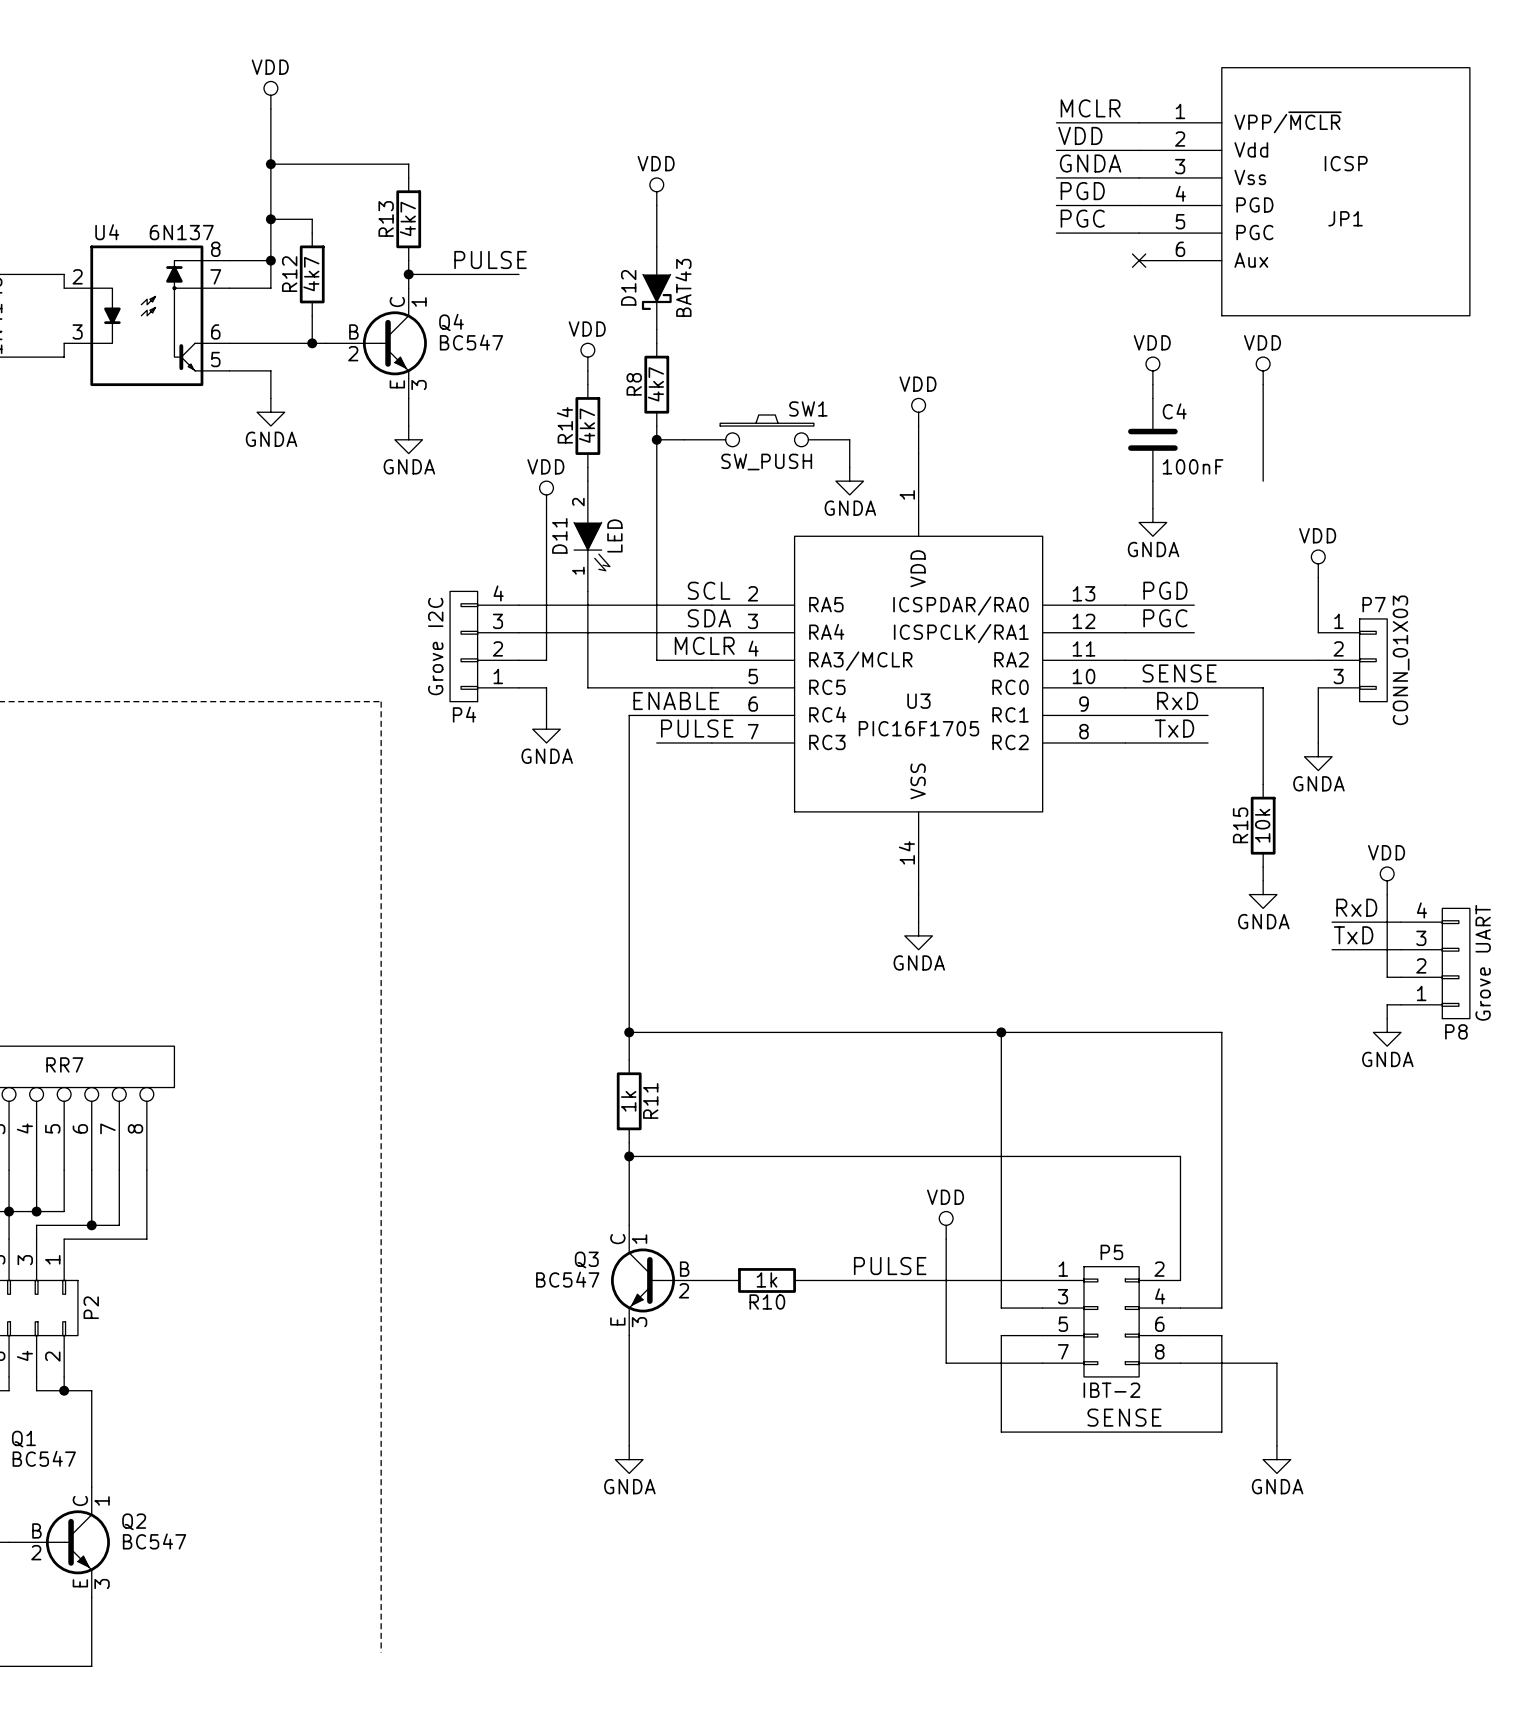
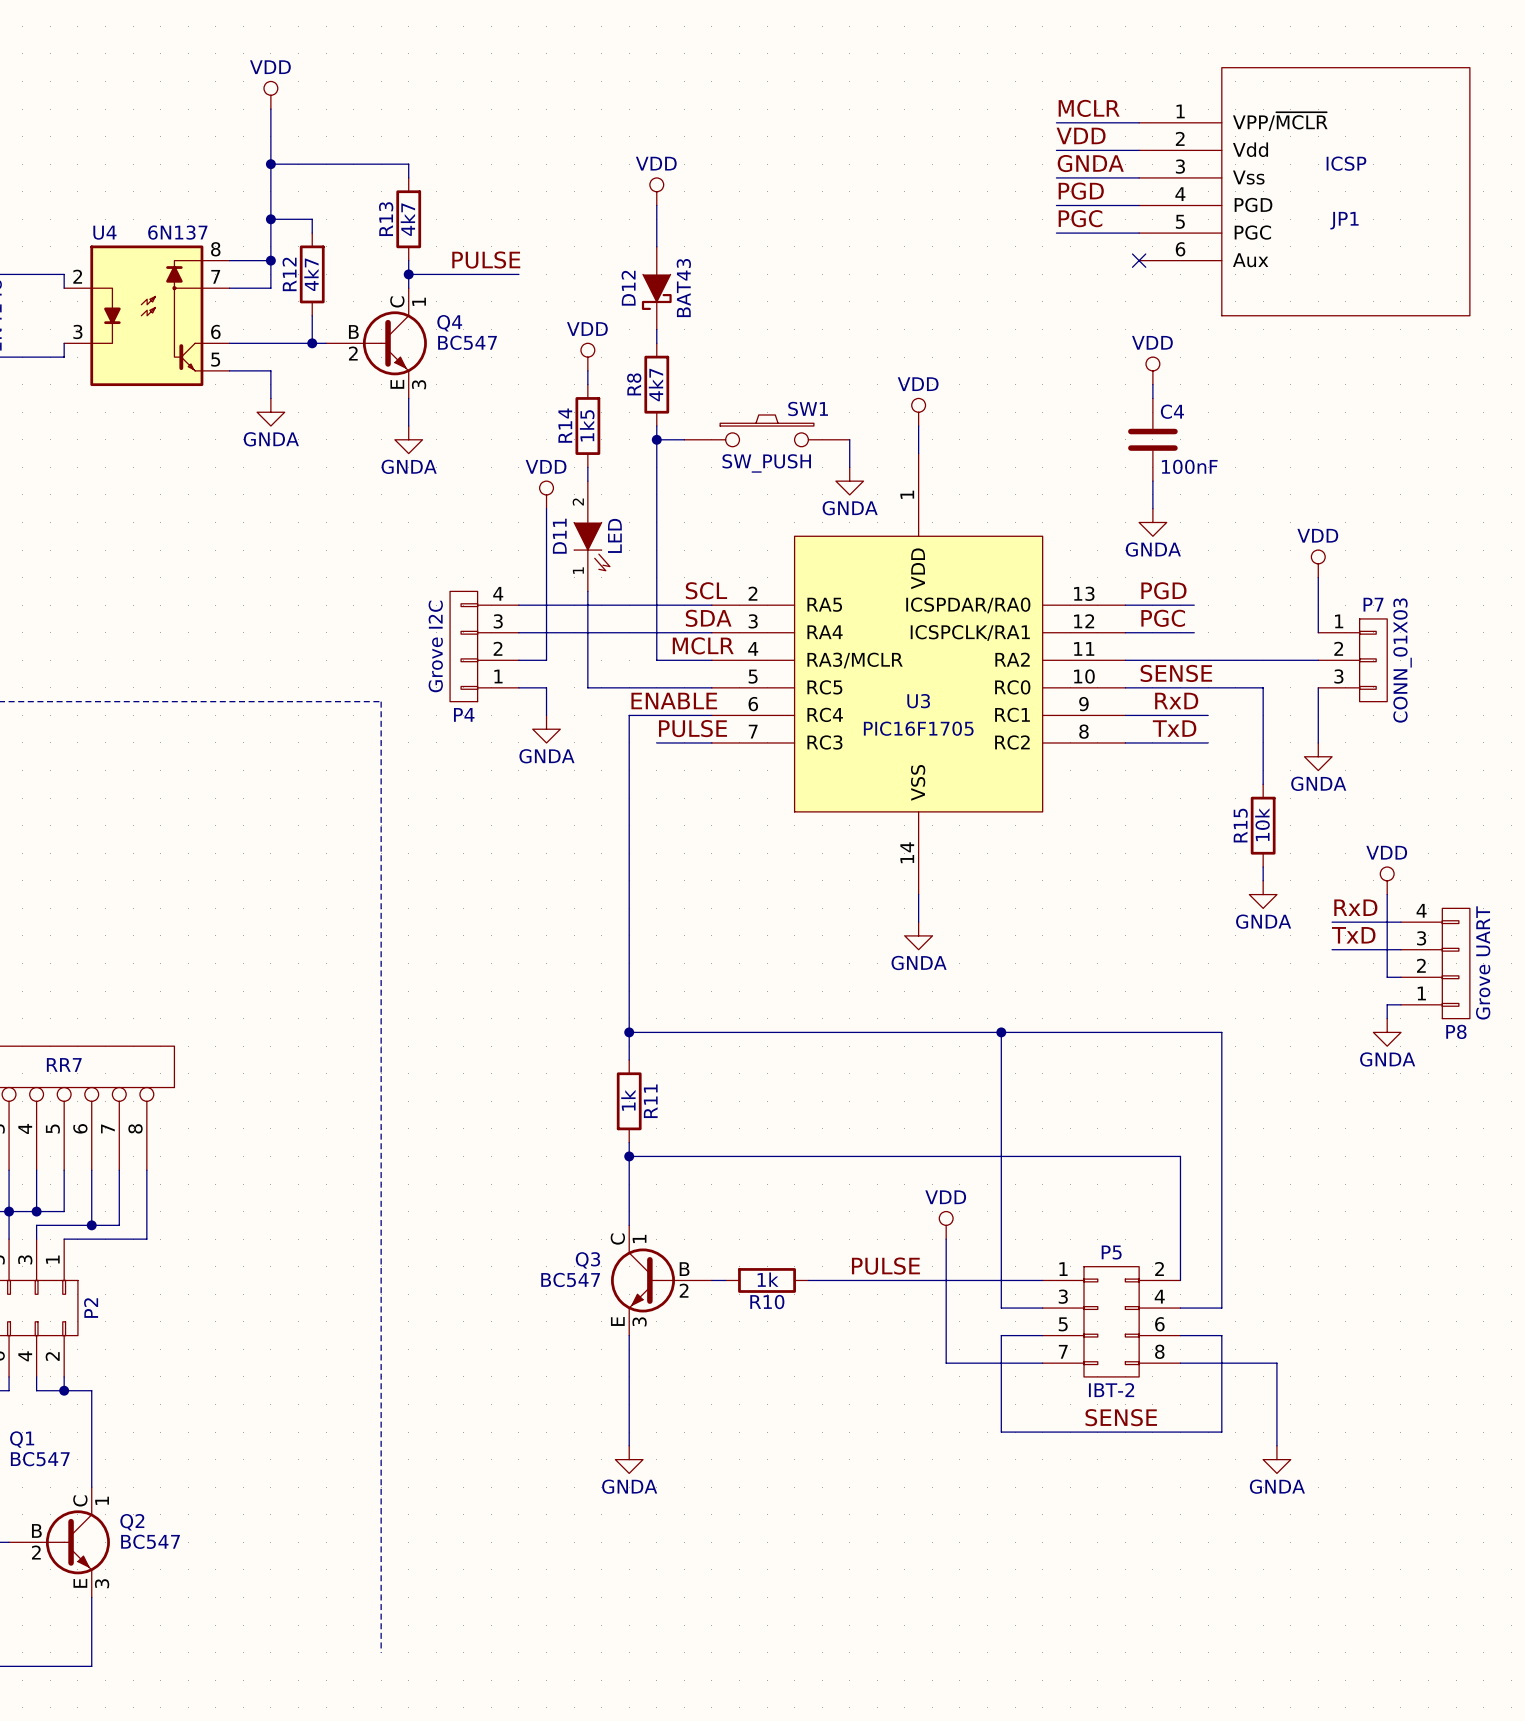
power symbol: VDD (1263, 370) -> none
wire: (1263, 384) (1263, 481) -> none
R14 value: 4k7 (587, 425) -> 1k5 (587, 425)

